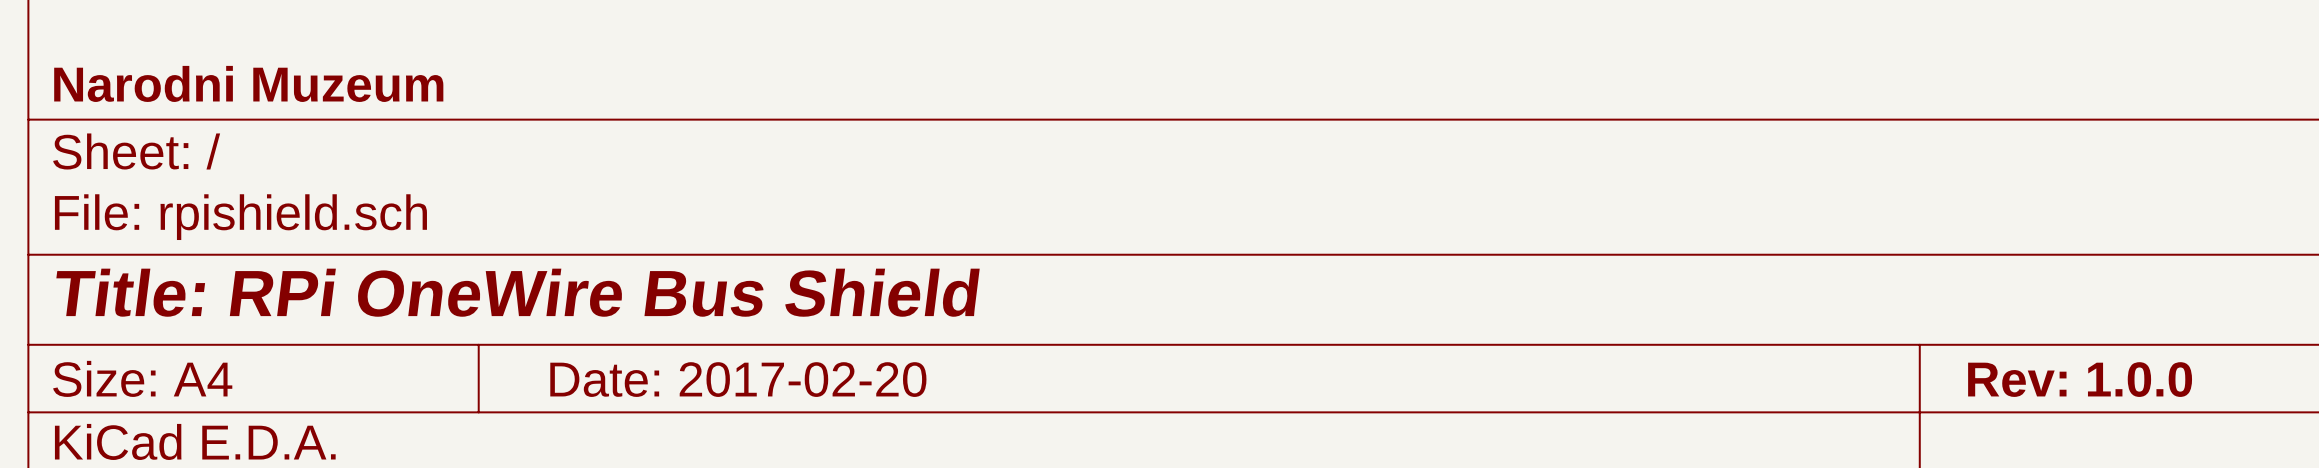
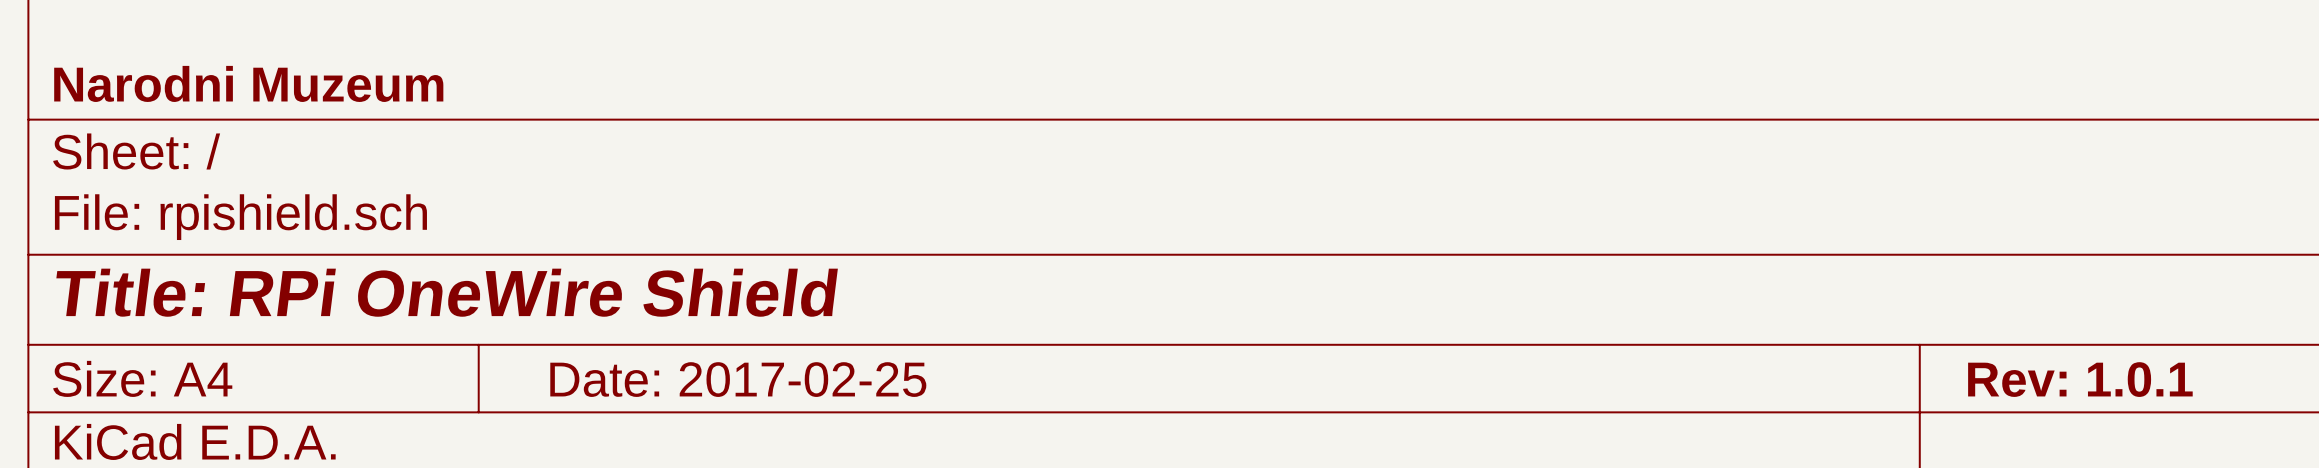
title block: Title: RPi OneWire Bus Shield (518, 292) -> Title: RPi OneWire Shield (447, 292)
title block: Date: 2017-02-20 (738, 379) -> Date: 2017-02-25 (738, 379)
title block: Rev: 1.0.0 (2080, 379) -> Rev: 1.0.1 (2080, 379)

